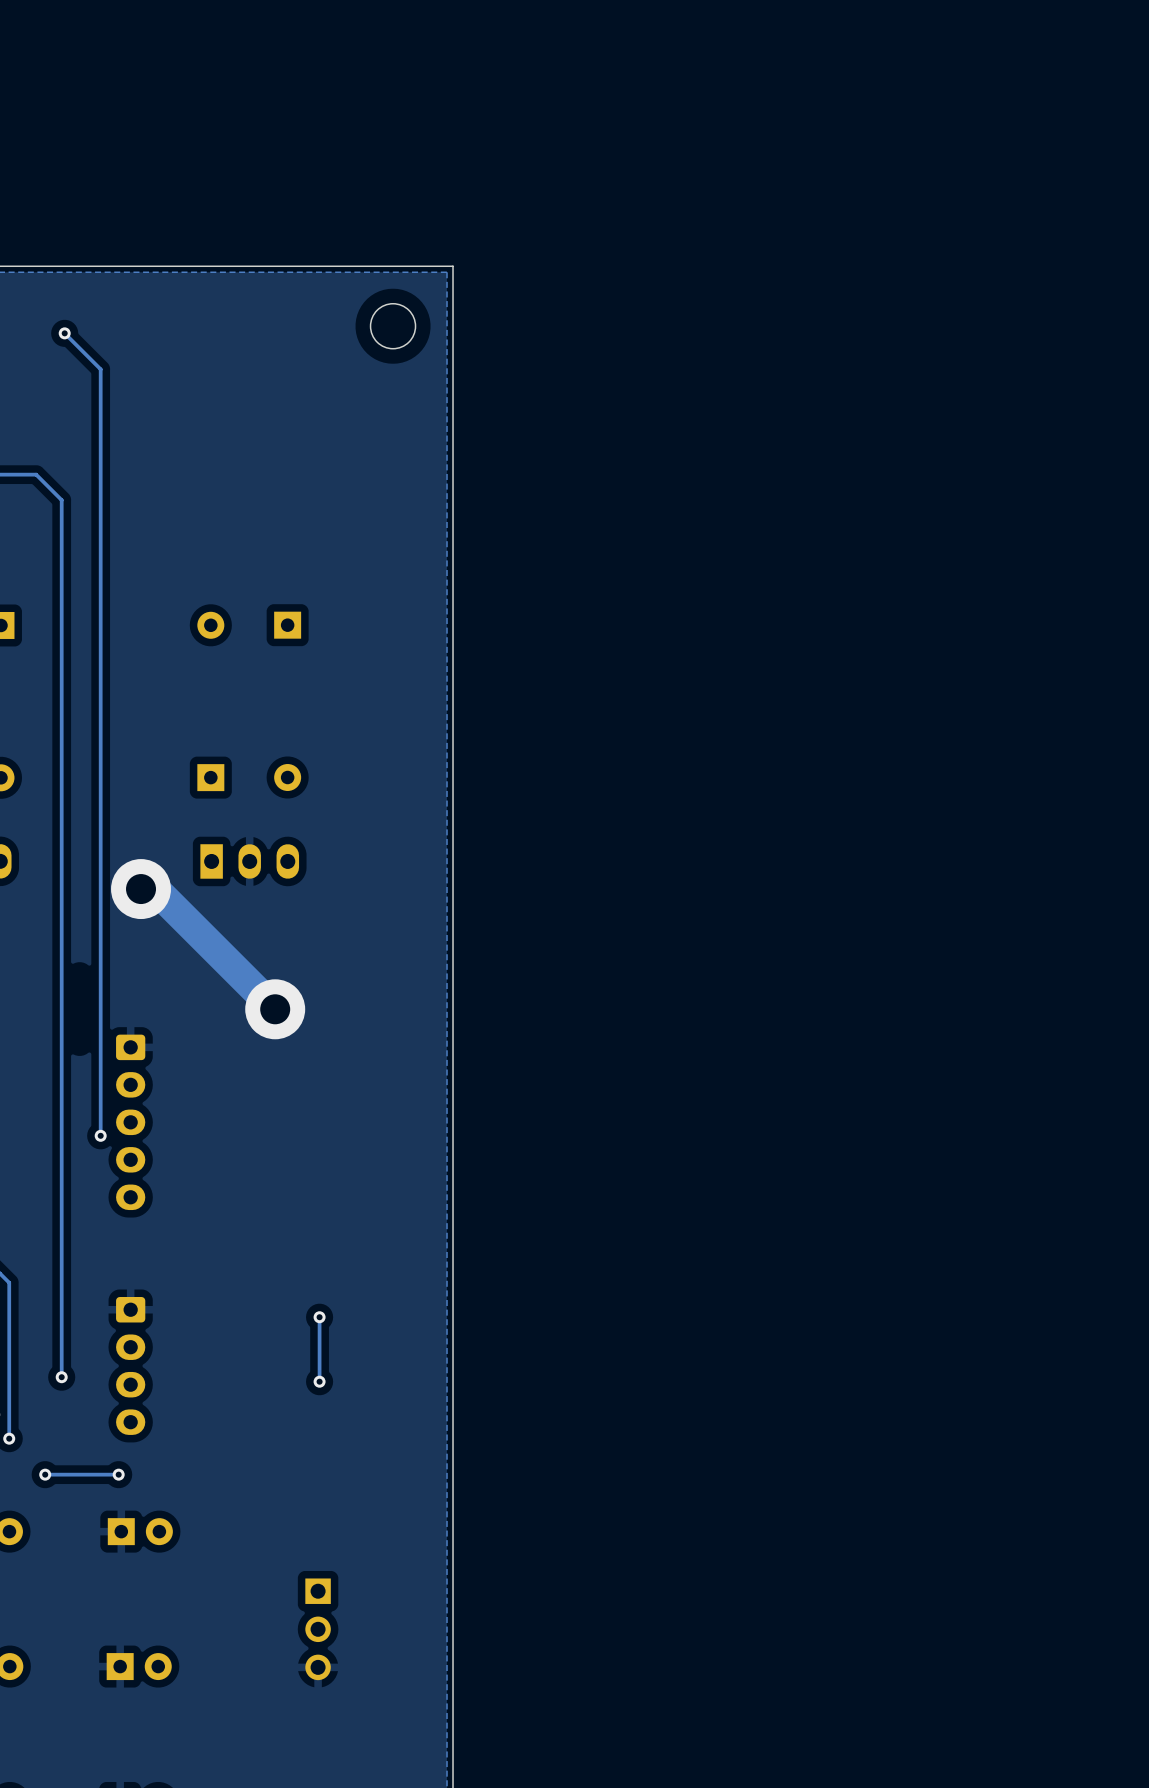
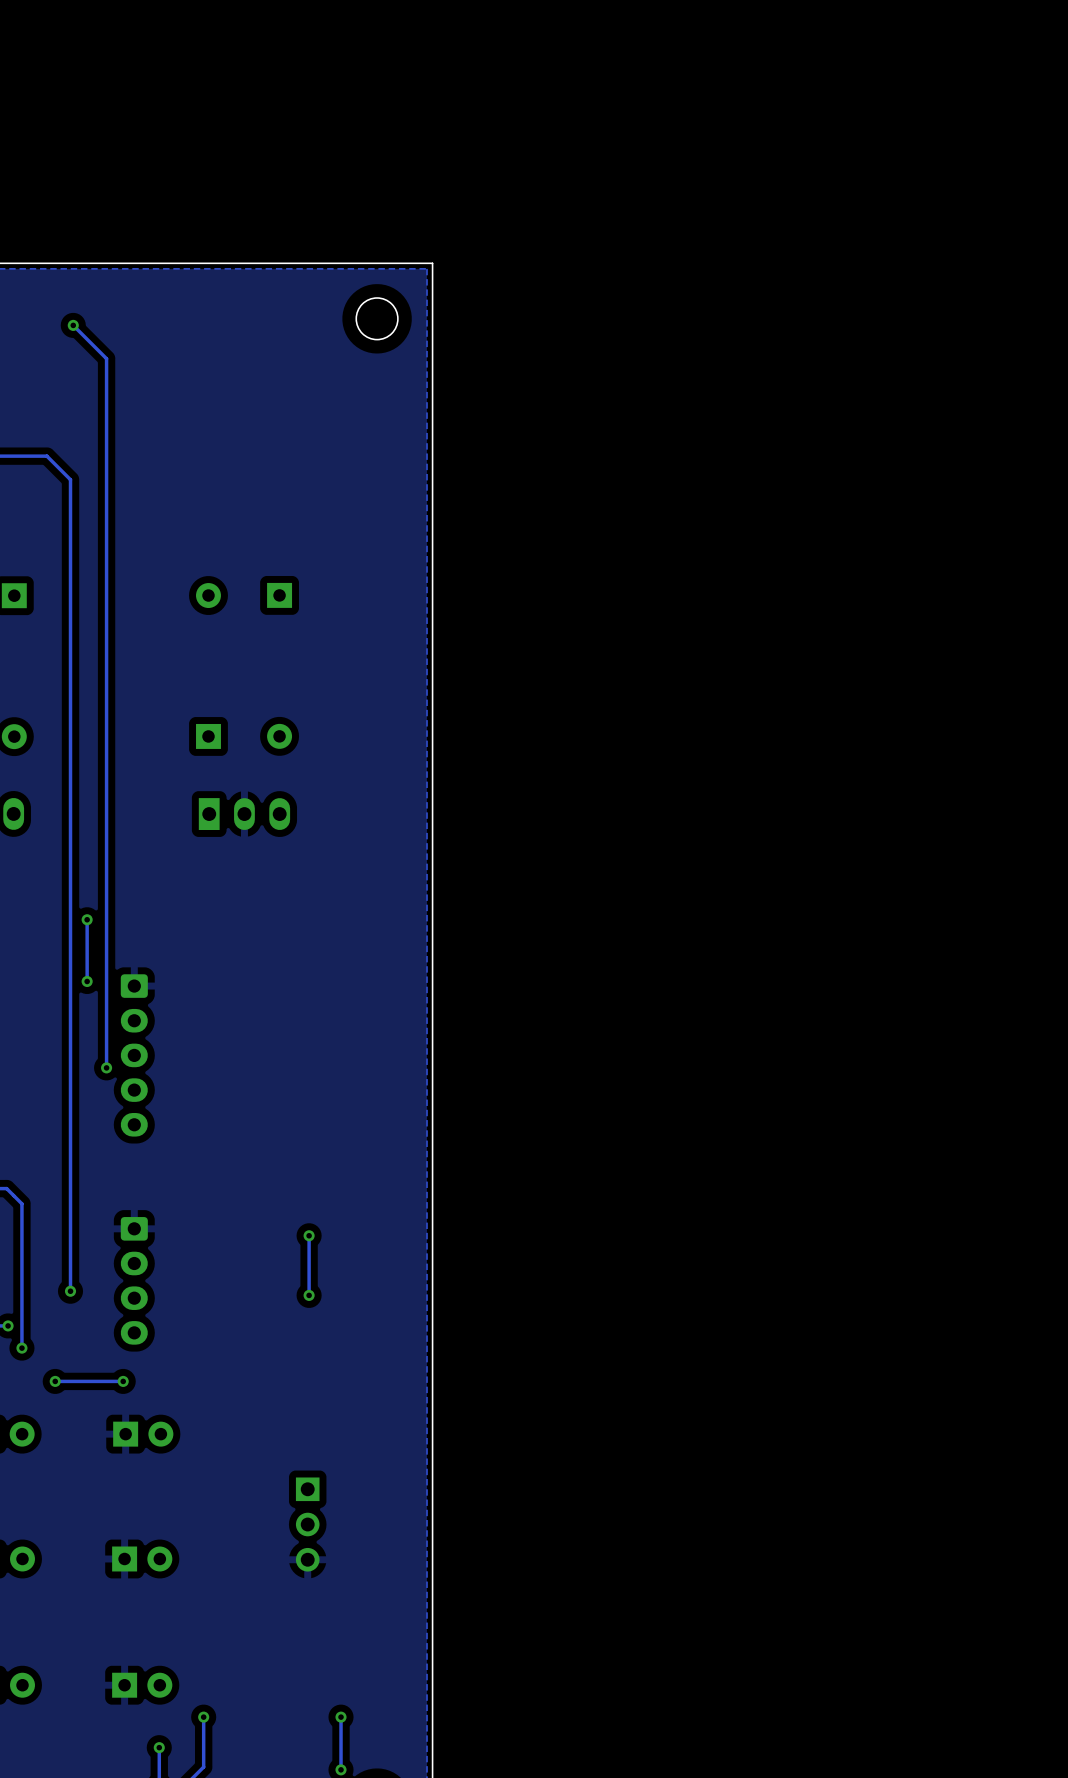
track: (141, 889) (154, 889) (275, 1009) -> none
via: (141, 889) -> none
track: none -> (87, 919) (87, 981)
via: none -> (87, 919)
via: (275, 1009) -> none
via: none -> (87, 981)

